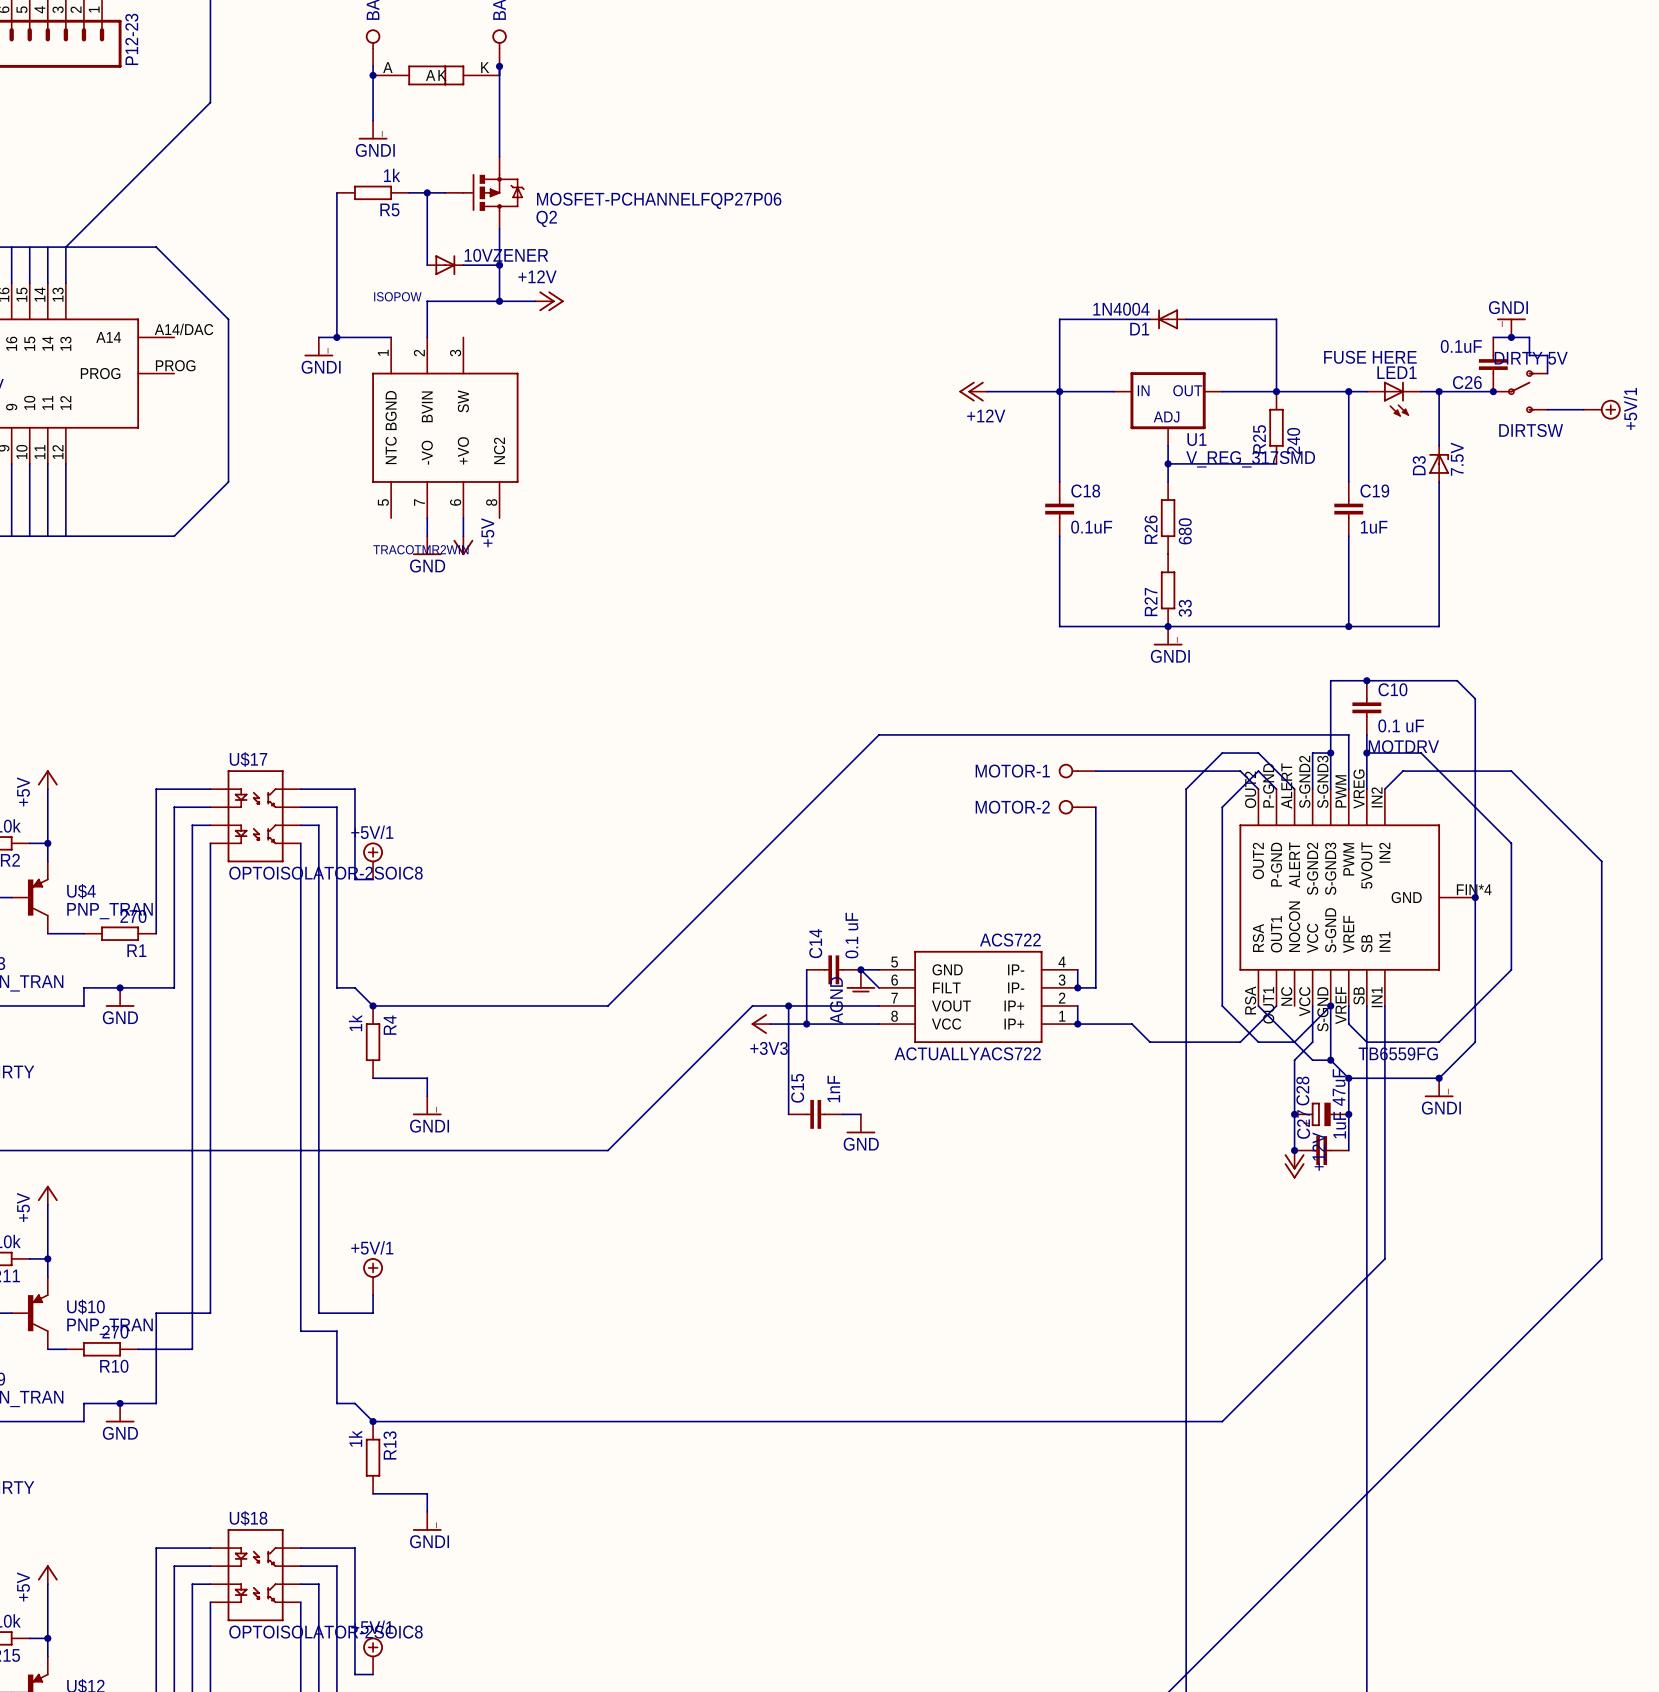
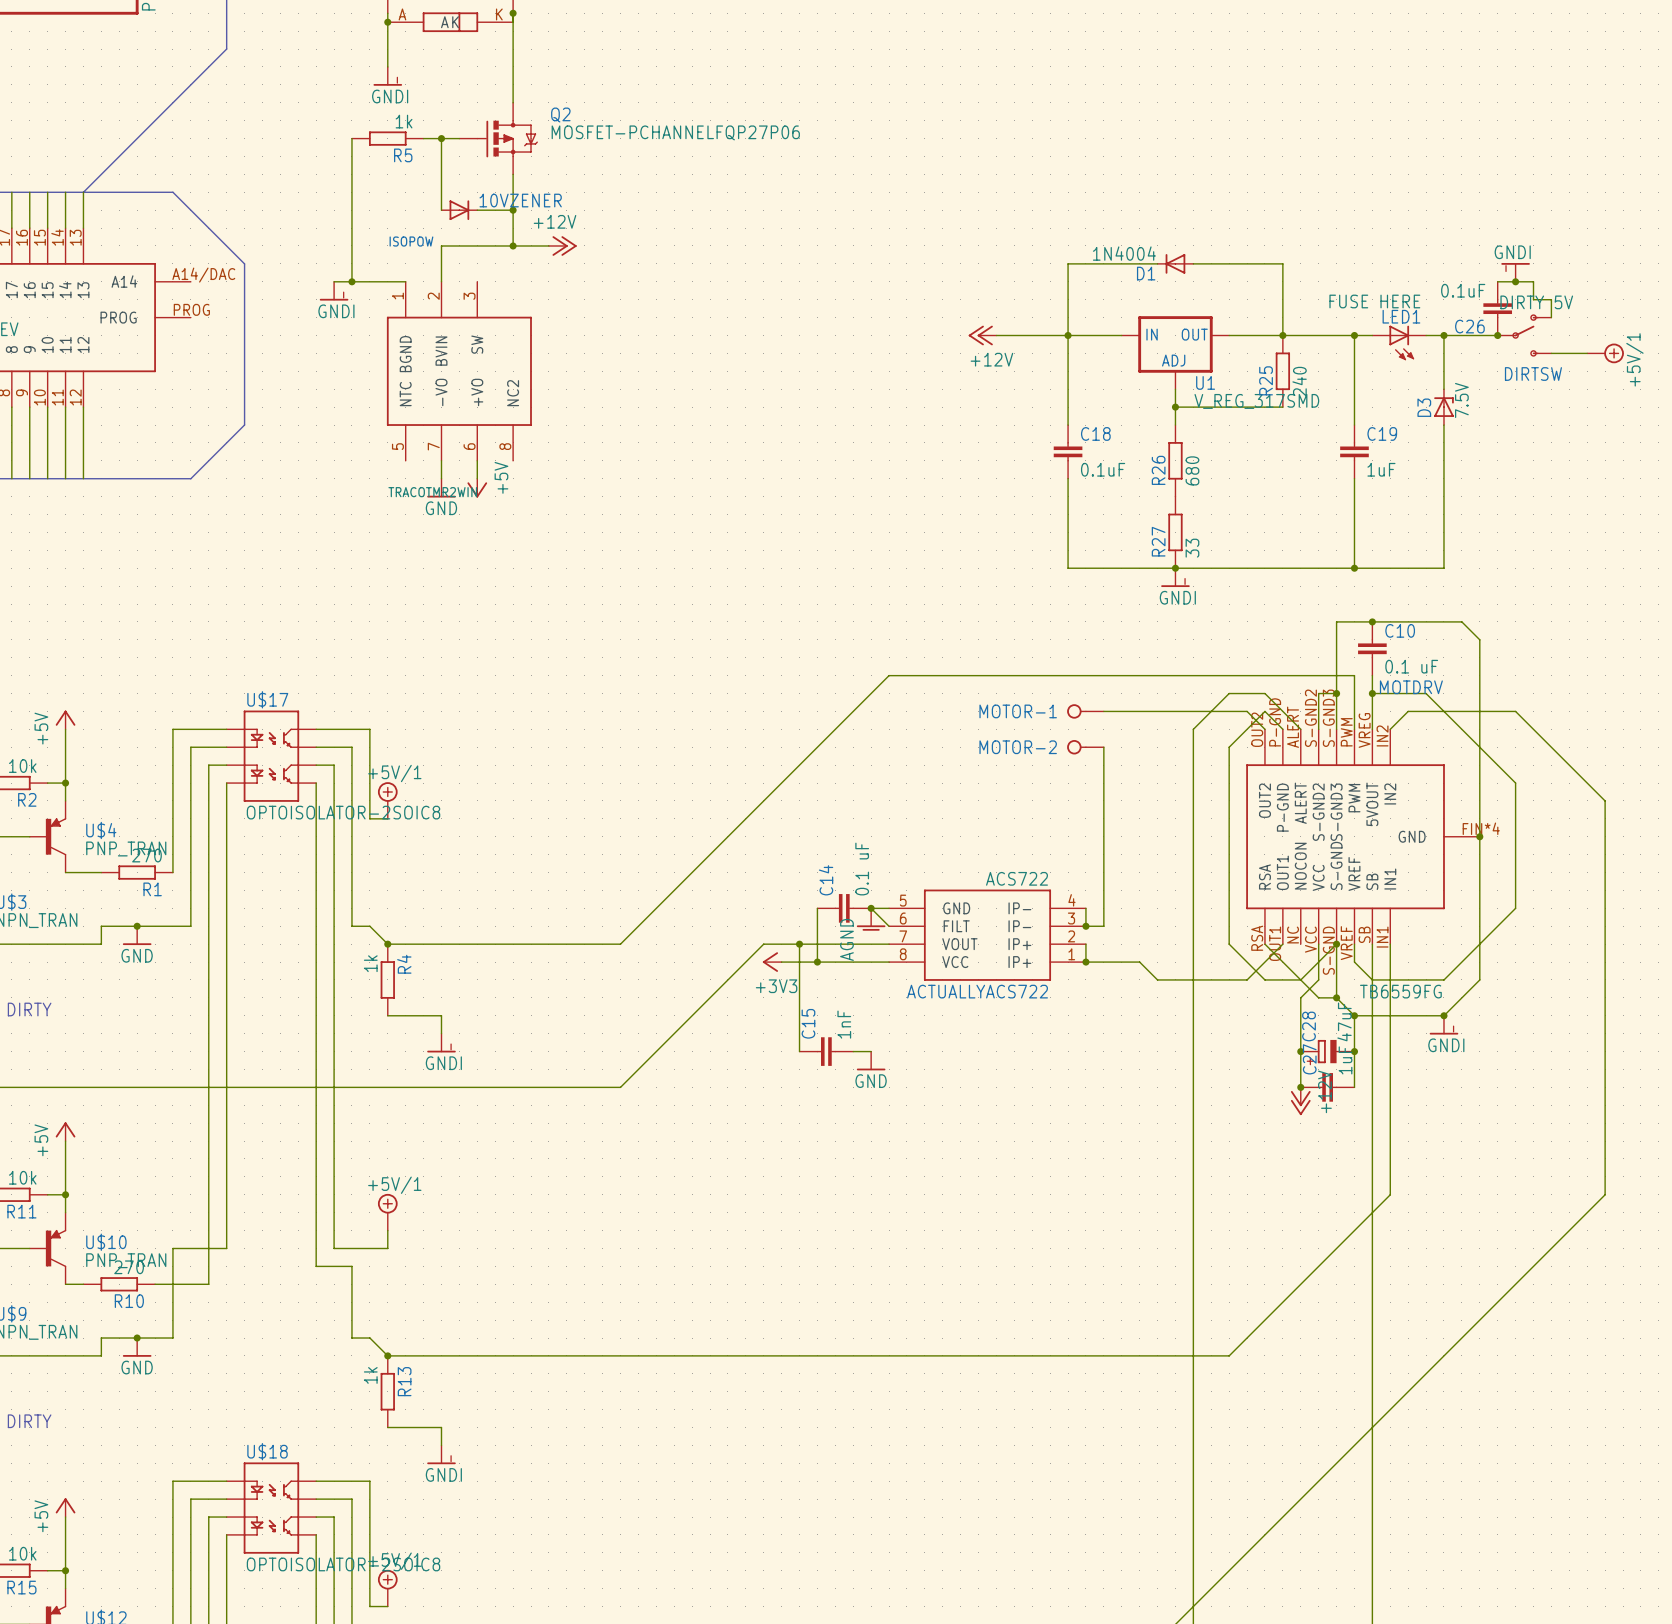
Q2 flip: as is (493, 192) -> up-down (507, 138)

